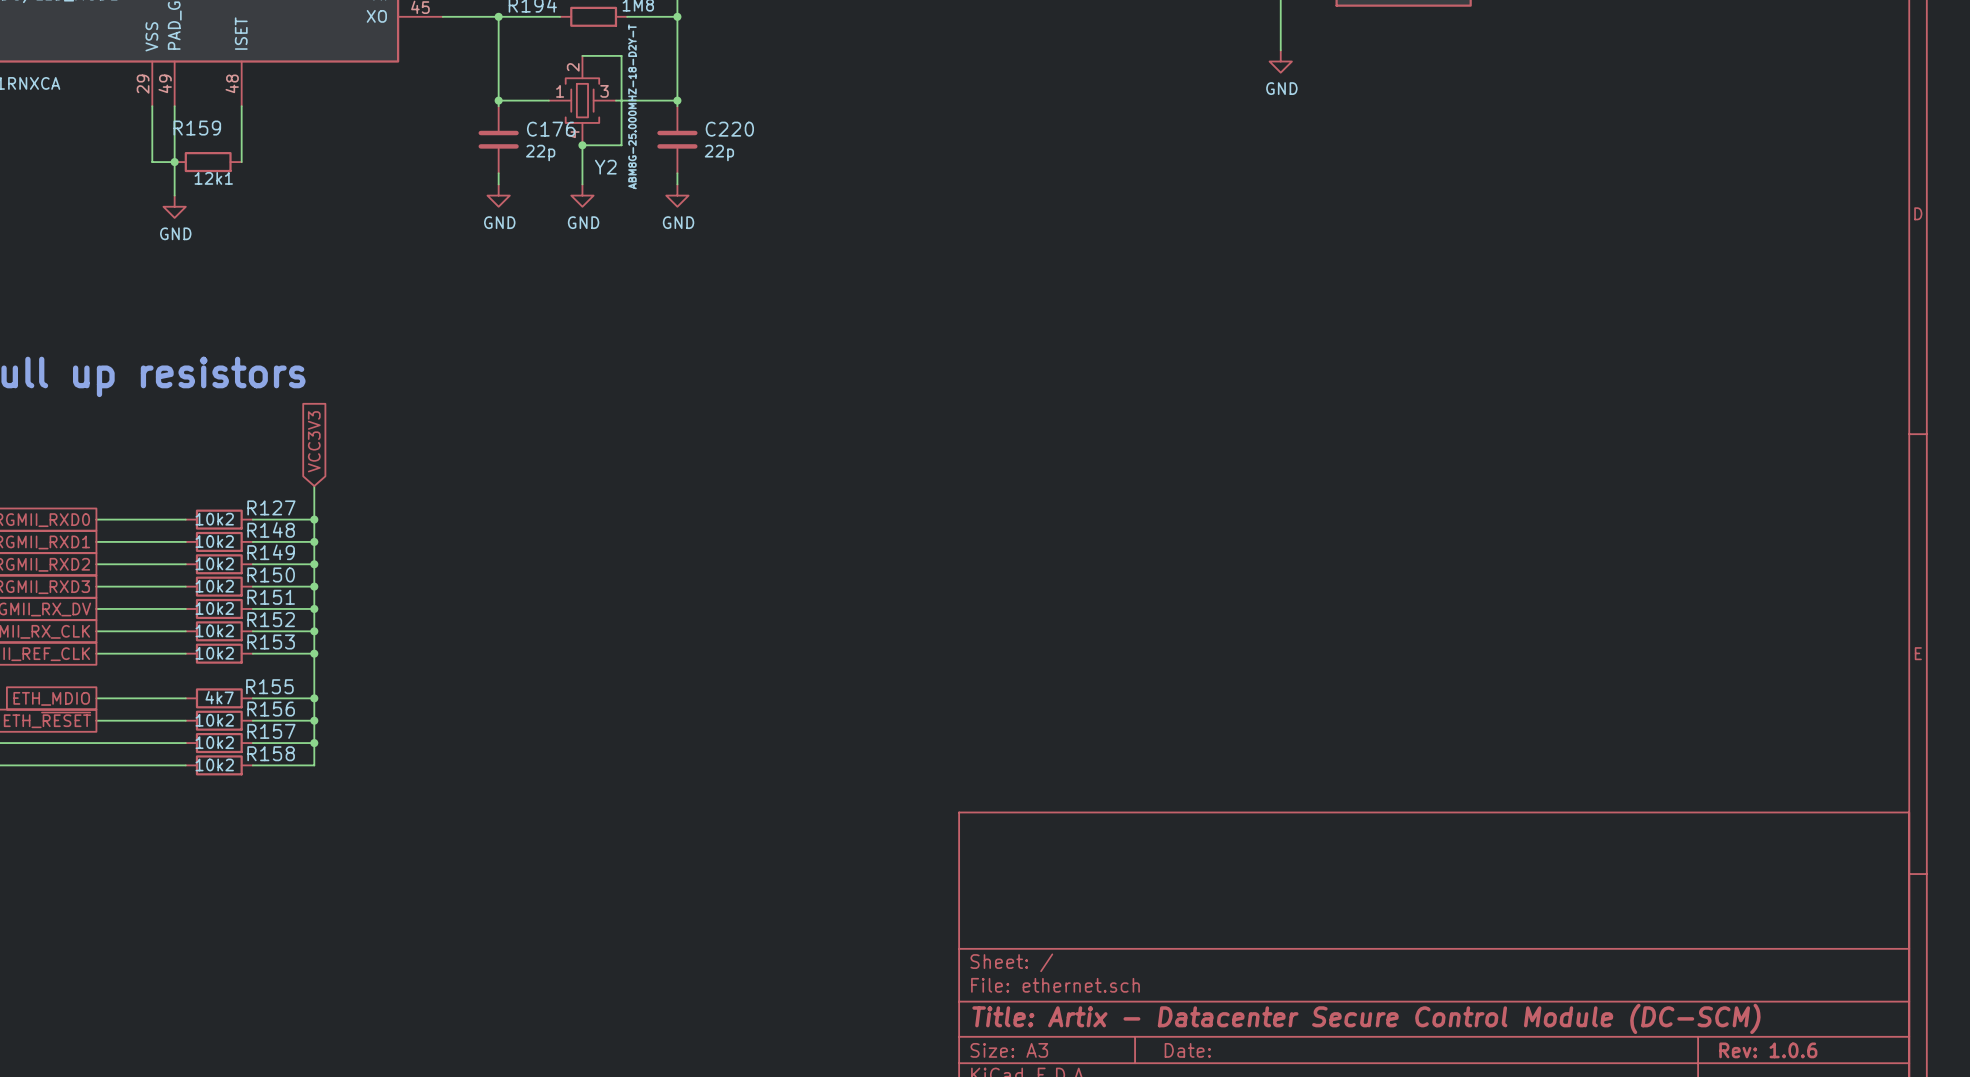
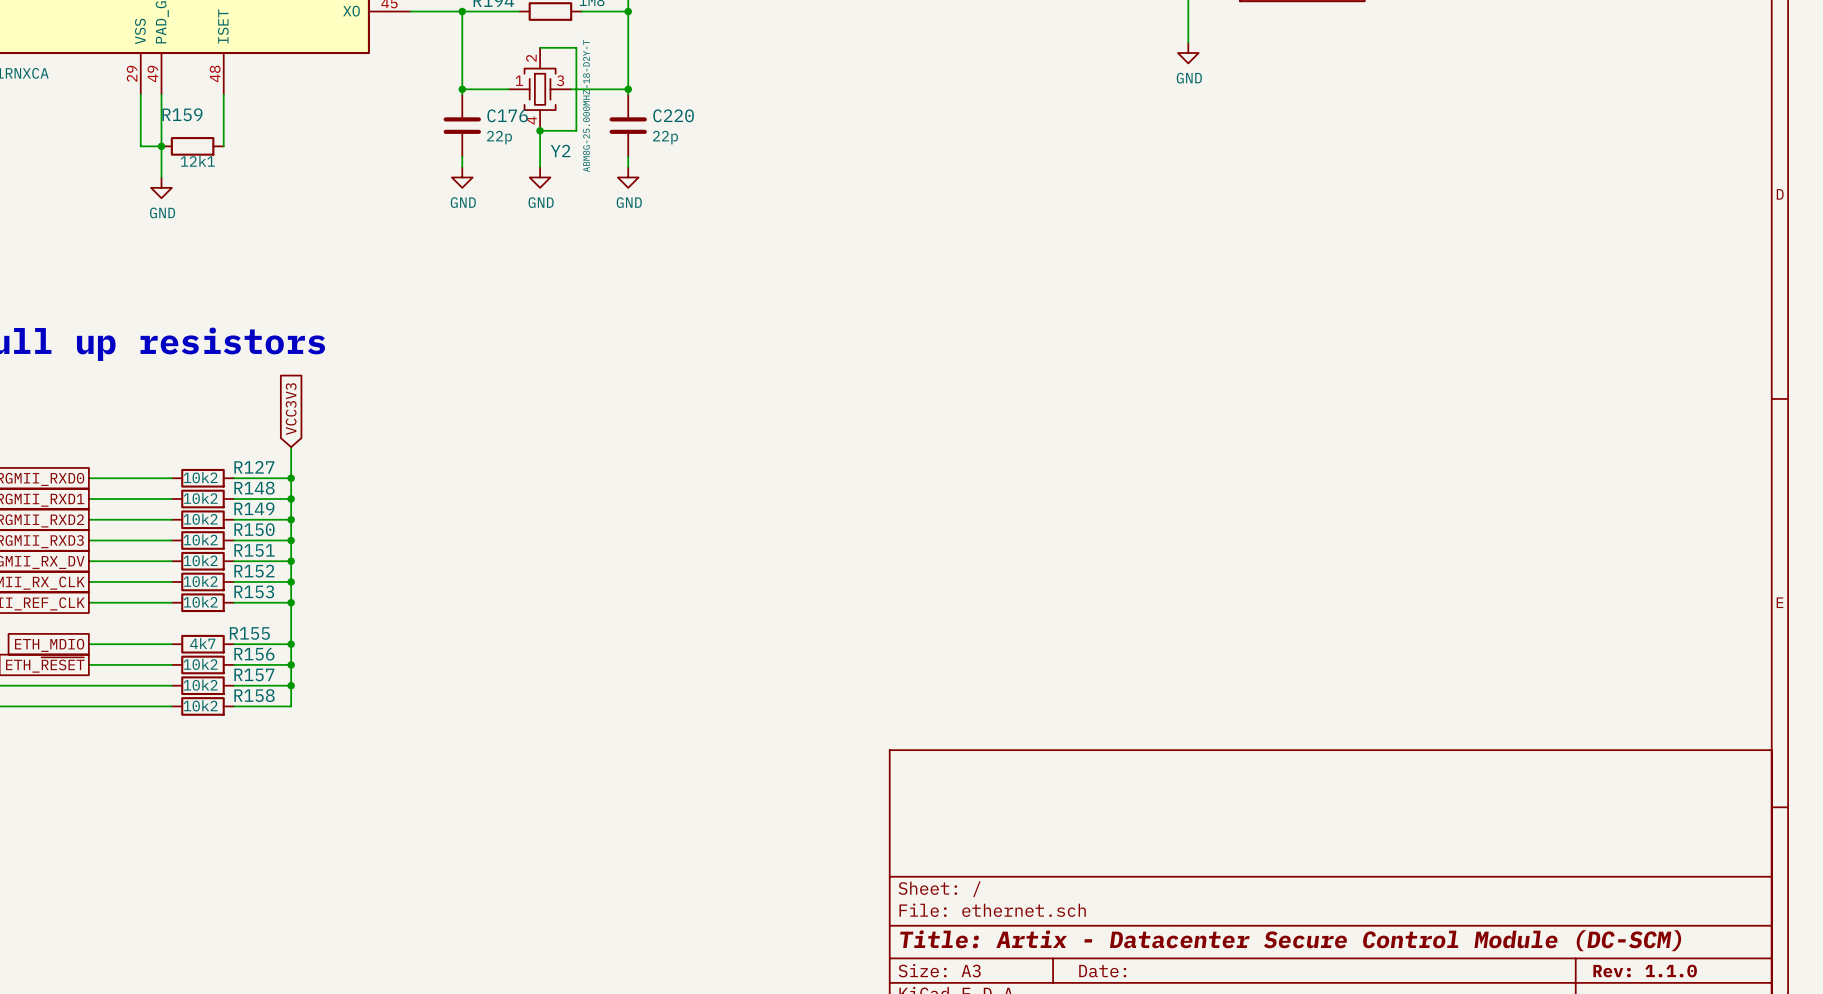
title block: Rev: 1.0.6 (1768, 1050) -> Rev: 1.1.0 (1645, 971)

